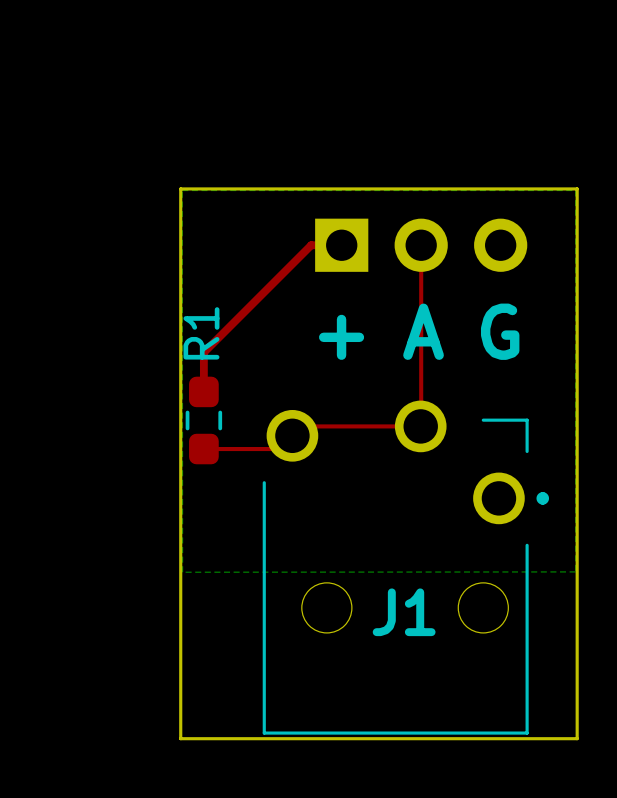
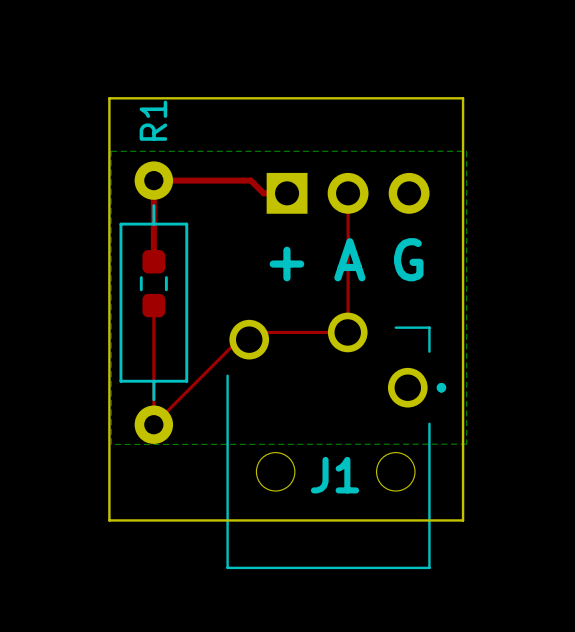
board edge: (180, 188) (577, 188) (577, 738) (180, 738) (180, 188) -> (109, 98) (109, 520) (463, 520) (463, 98) (109, 98)
bottom zone outline: (575, 190) (182, 190) (182, 572) -> (466, 151) (111, 151) (111, 444) (164, 444)
top track: (311, 245) (203, 352) (203, 391) -> (263, 193) (250, 180) (153, 180) (153, 261)
R1 name position: R1 (201, 333) -> R1 (153, 120)
part: none -> (153, 302)
top track: none -> (153, 305) (153, 424) (238, 339) (249, 339)
R1 position: (203, 420) -> (153, 283)
top track: (203, 449) (279, 449) -> none

